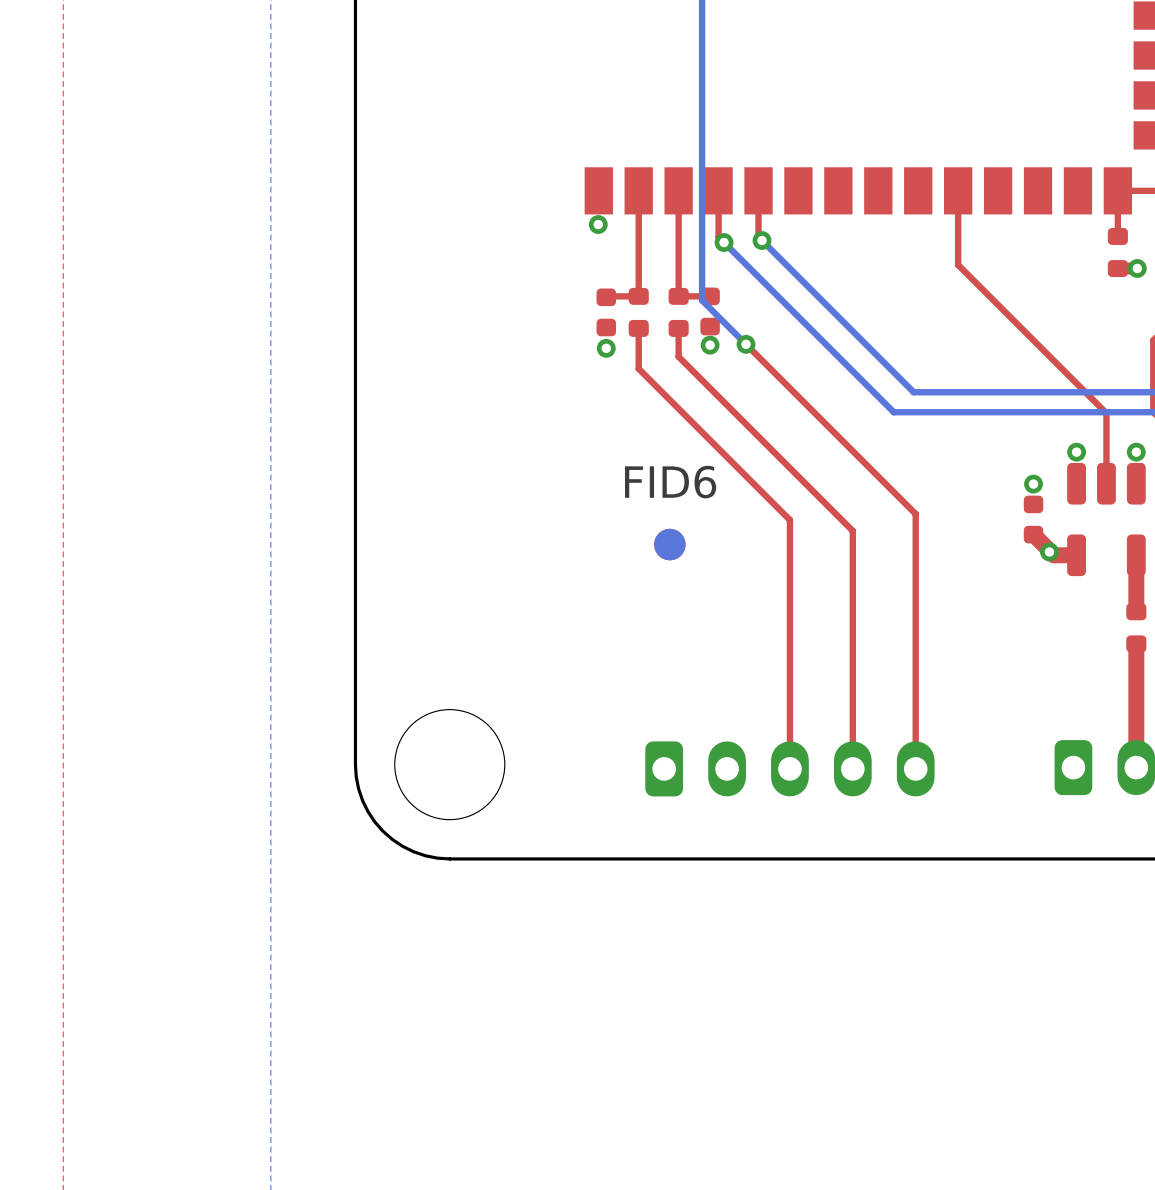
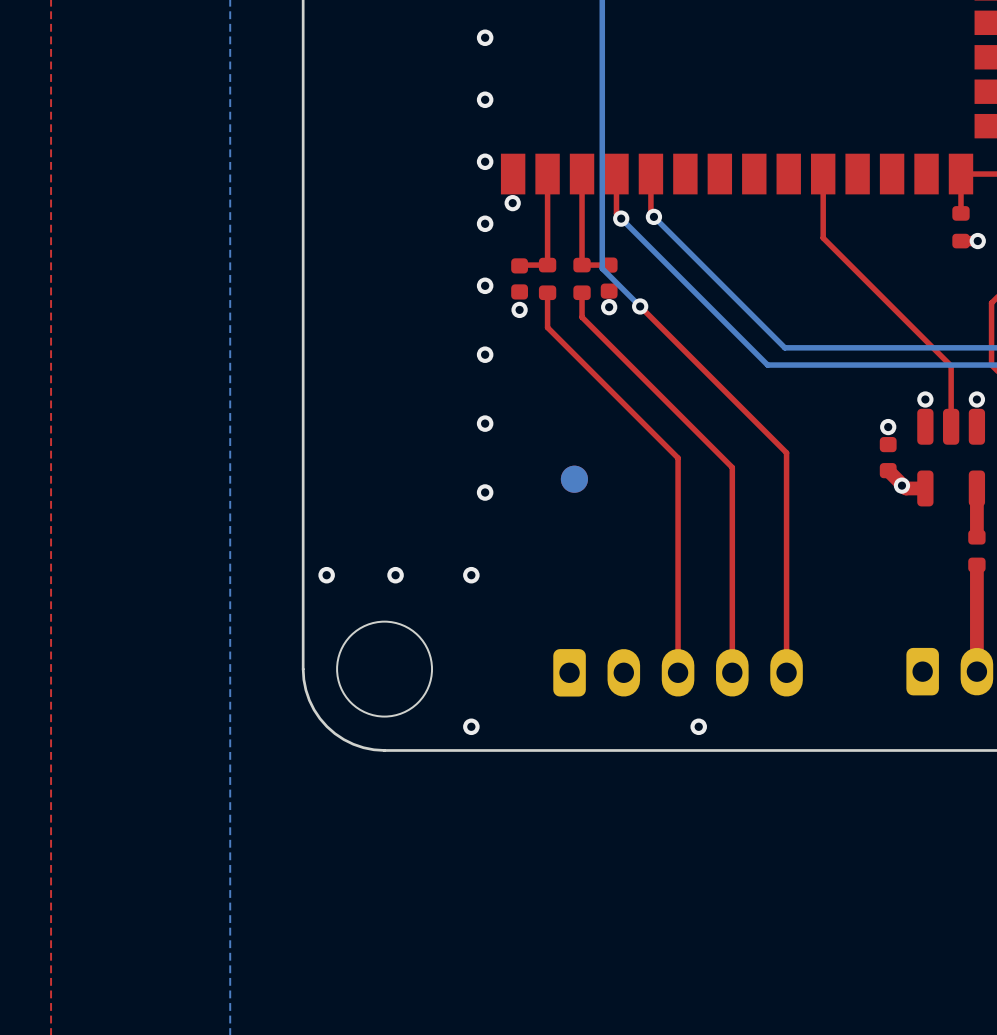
via: none -> (485, 37)
via: none -> (485, 99)
via: none -> (485, 161)
via: none -> (485, 223)
via: none -> (485, 285)
via: none -> (485, 354)
via: none -> (485, 423)
FID6 name: FID6 (670, 482) -> none
via: none -> (485, 492)
via: none -> (326, 575)
via: none -> (395, 575)
via: none -> (471, 575)
via: none -> (471, 726)
via: none -> (698, 726)

